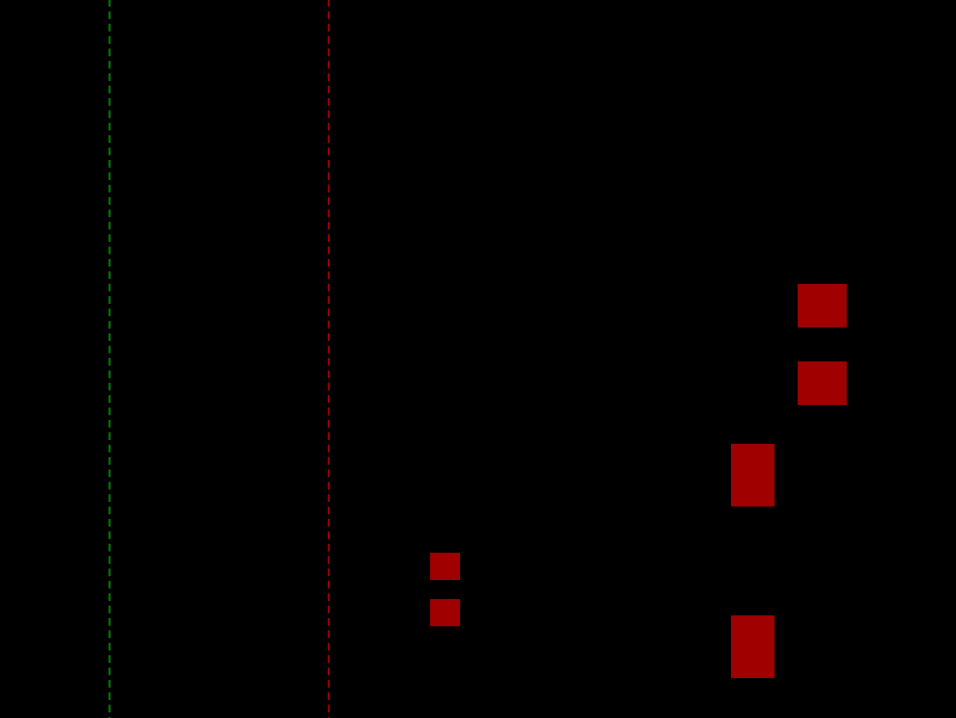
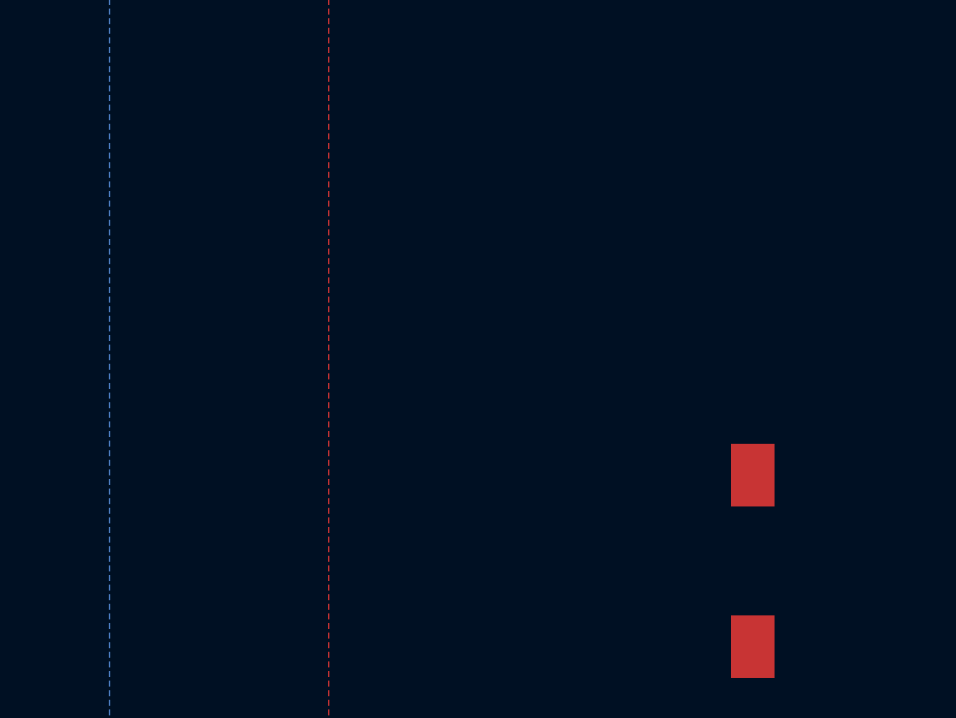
part: (822, 344) -> none
part: (445, 589) -> none

